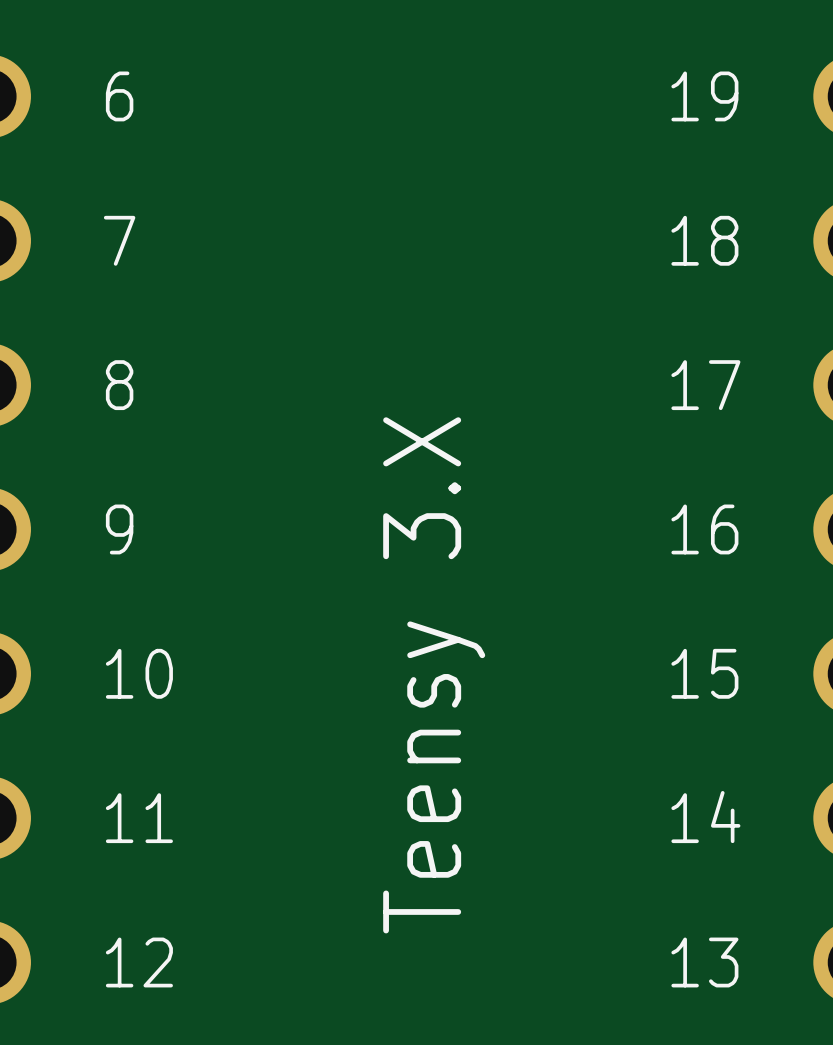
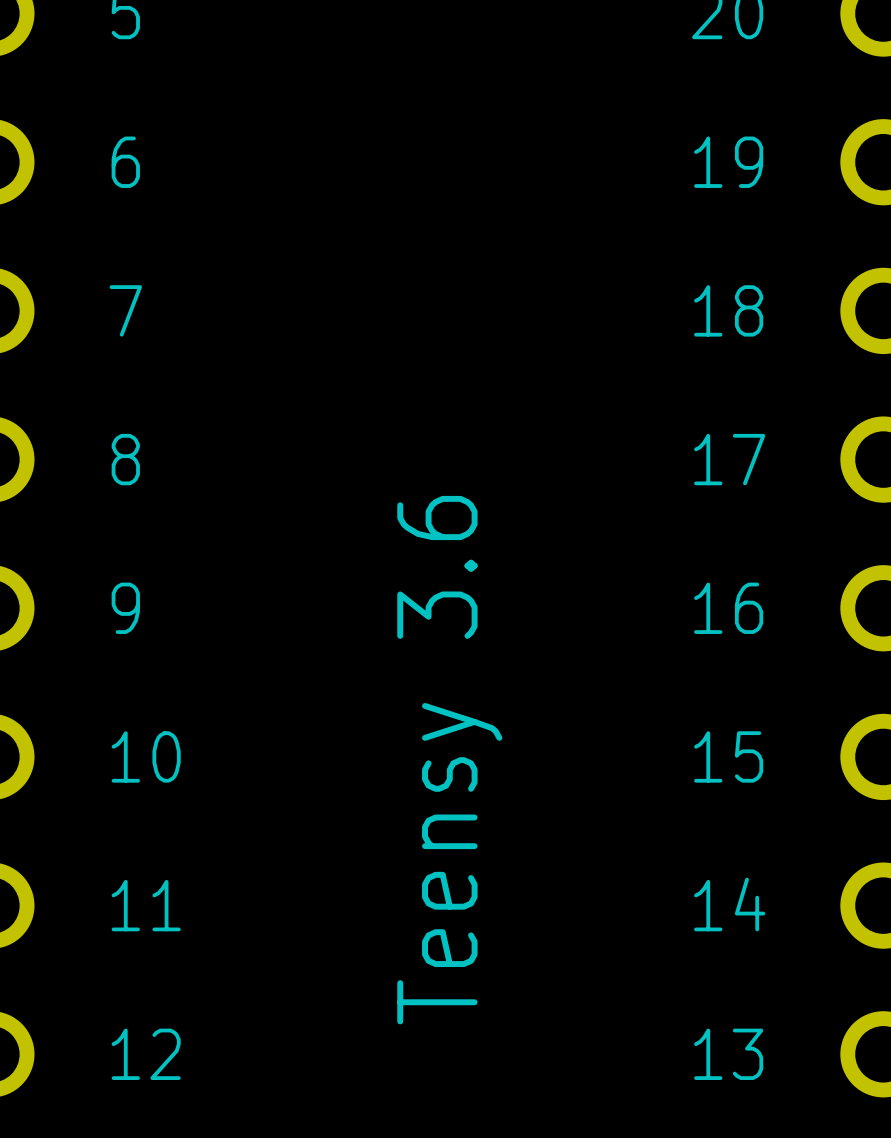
text: Teensy 3.X (434, 675) -> Teensy 3.6 (449, 760)

